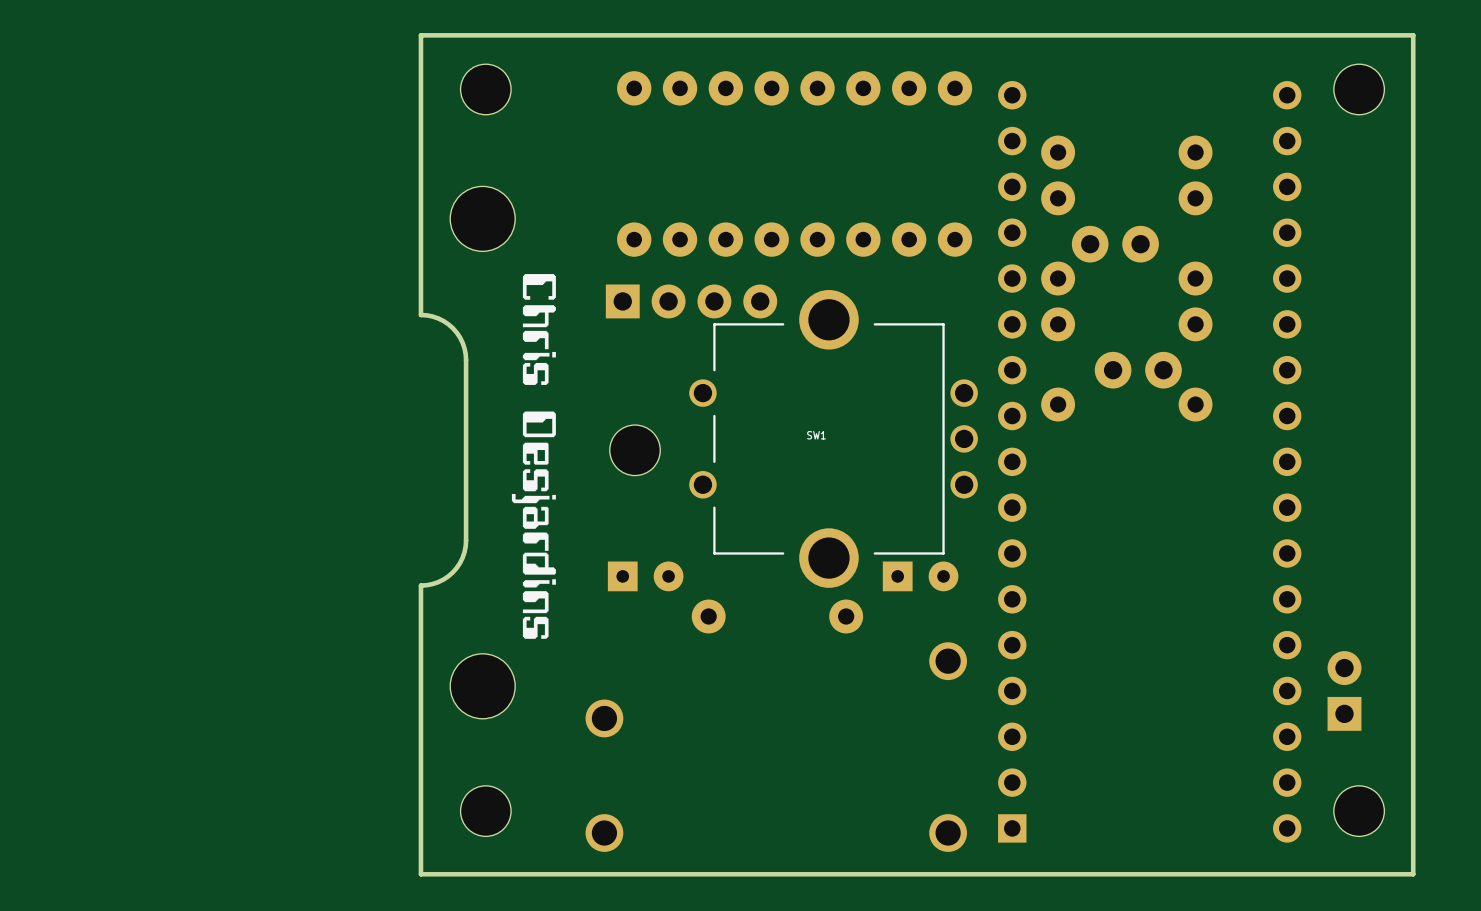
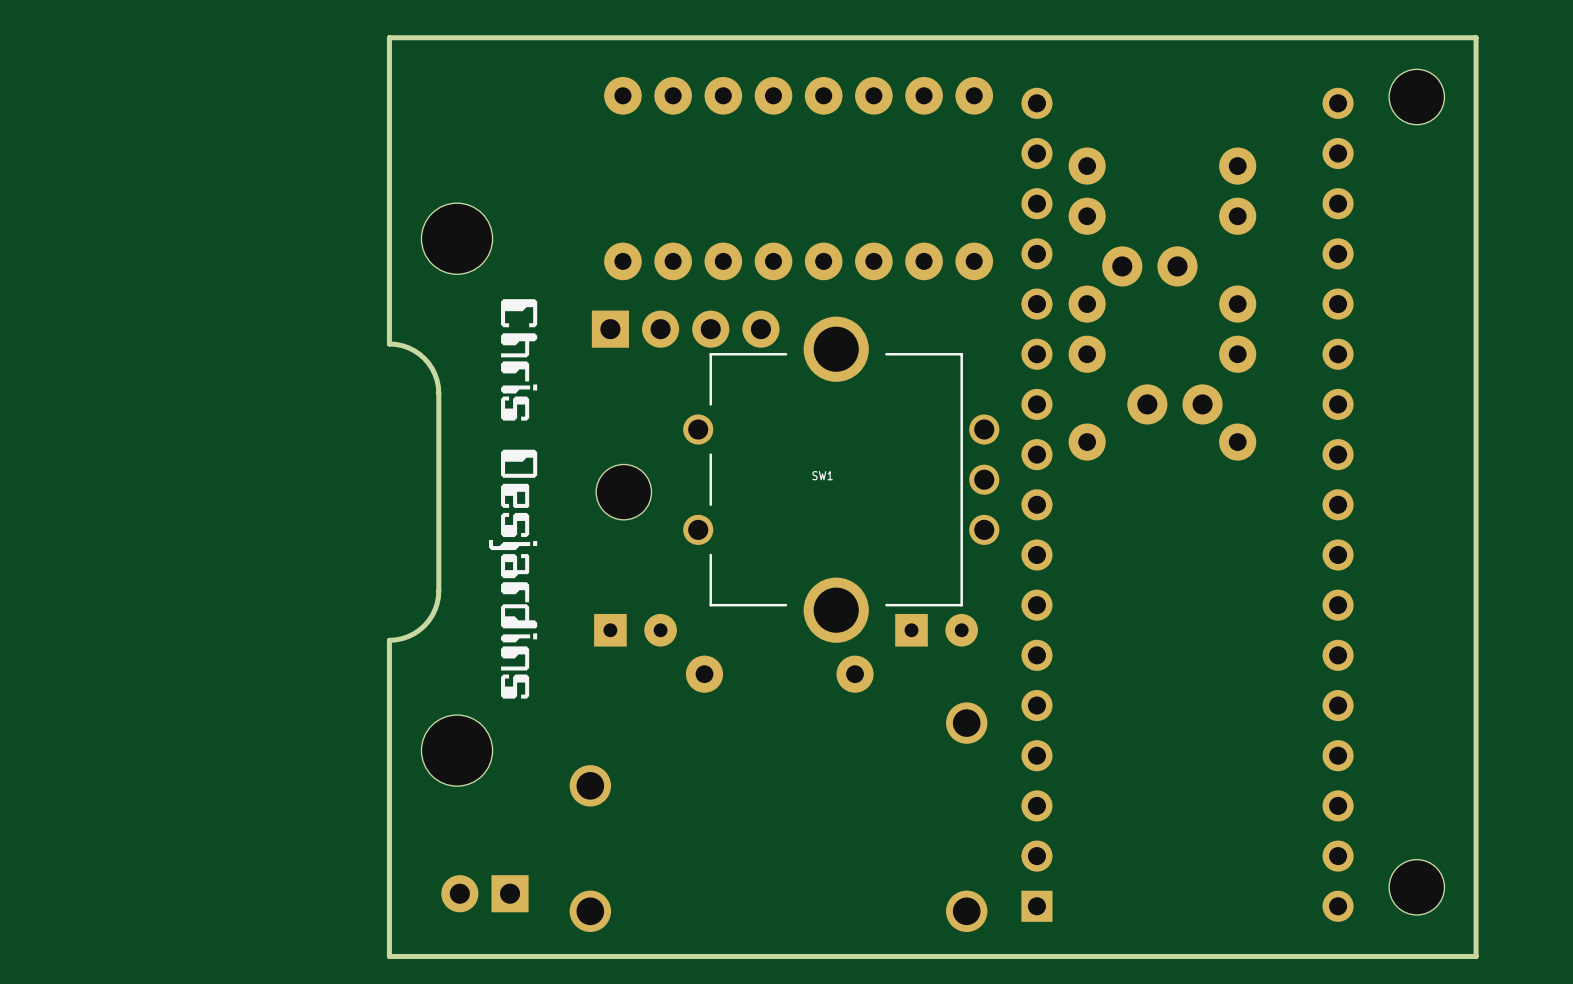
hole: (485, 89) -> none
part: (1344, 690) -> none
hole: (485, 811) -> none
part: none -> (484, 893)

